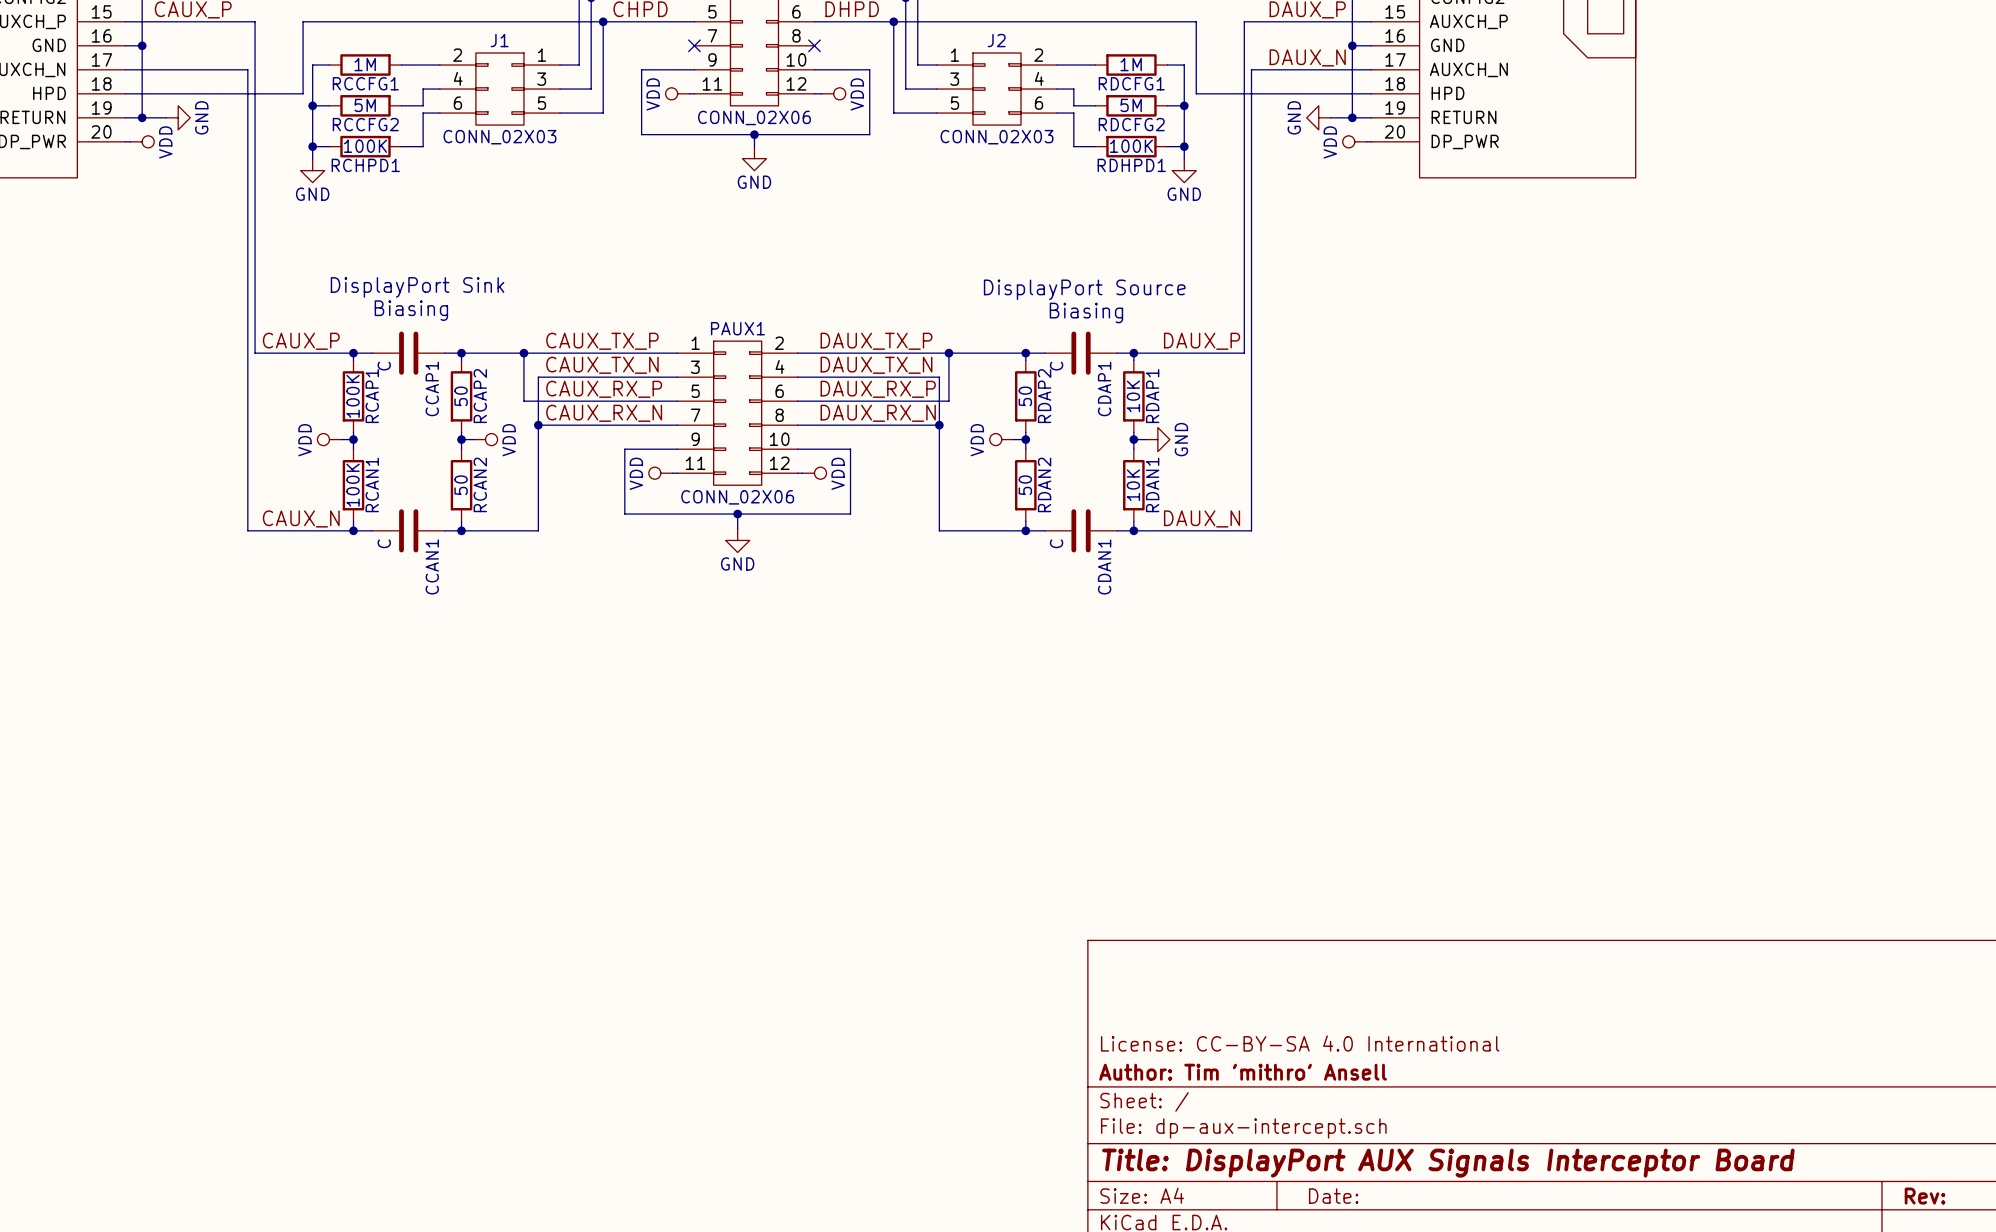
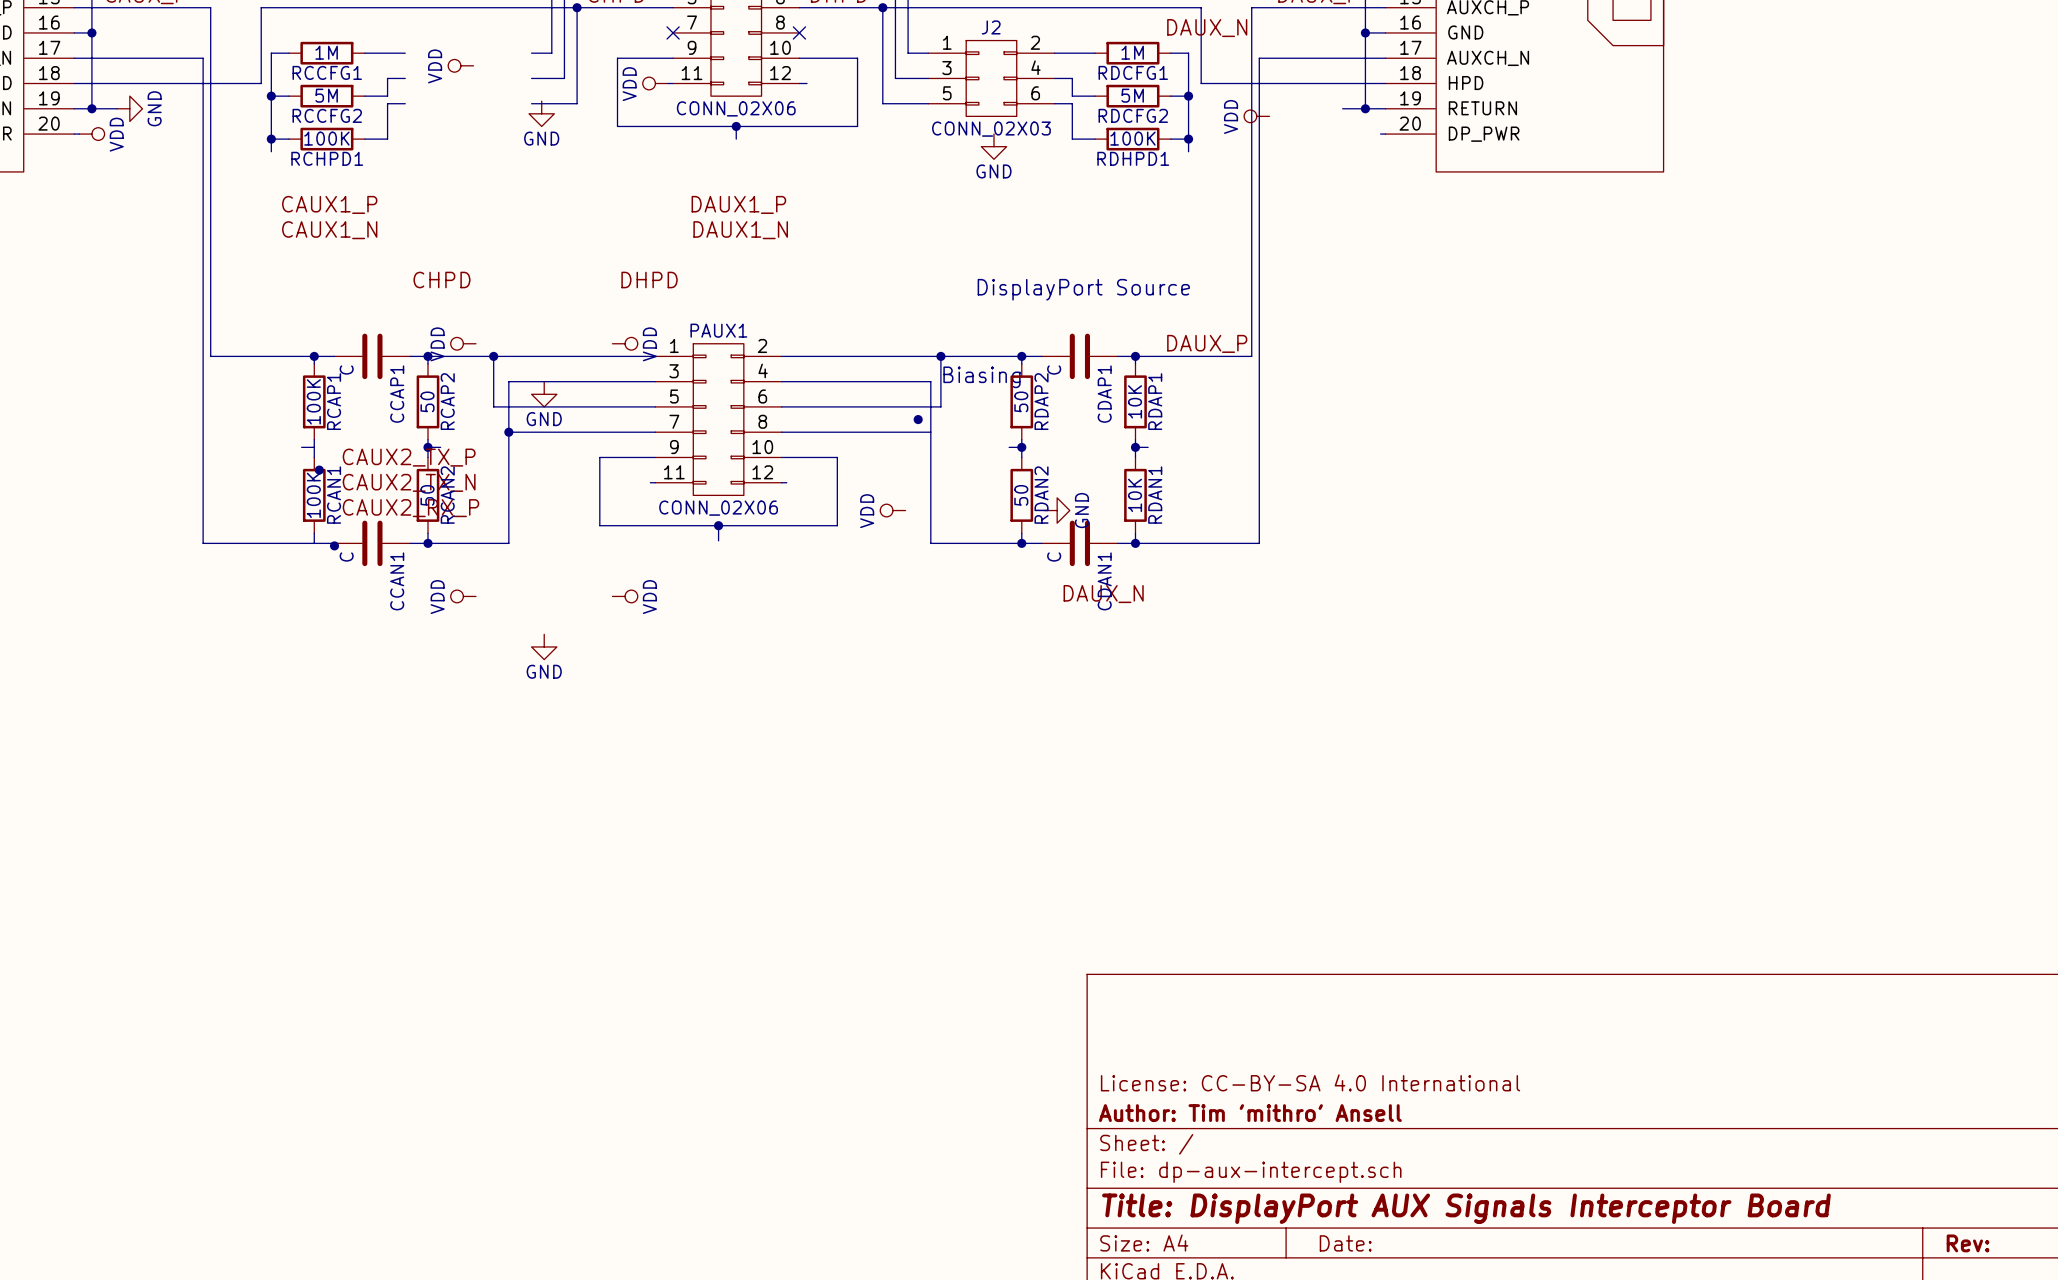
label position: DAUX_N (1307, 57) -> DAUX_N (1207, 28)
power symbol: none -> VDD (460, 65)
J1: CONN_02X03 (499, 89) -> none
power symbol: VDD (833, 93) -> none
power symbol: GND (1318, 117) -> none
power symbol: none -> GND (541, 113)
power symbol position: VDD (1354, 141) -> VDD (1256, 116)
power symbol: none -> GND (993, 146)
power symbol: GND (754, 158) -> none
power symbol: GND (312, 170) -> none
power symbol: GND (1184, 170) -> none
label: none -> CAUX1_P (329, 204)
label: none -> DAUX1_P (738, 204)
label: none -> CAUX1_N (329, 230)
label: none -> DAUX1_N (740, 230)
label: none -> CHPD (441, 280)
label: none -> DHPD (649, 280)
text: DisplayPort Sink (417, 287) -> none
text: Biasing (411, 310) -> none
text position: Biasing (1086, 313) -> Biasing (981, 377)
label: CAUX_P (301, 341) -> none
power symbol: none -> VDD (463, 343)
label: CAUX_TX_P (602, 341) -> none
power symbol: none -> VDD (625, 343)
label: DAUX_TX_P (876, 341) -> none
label: CAUX_TX_N (602, 365) -> none
label: DAUX_TX_N (876, 365) -> none
power symbol: none -> GND (544, 394)
label: CAUX_RX_P (604, 389) -> none
label: DAUX_RX_P (878, 389) -> none
label: CAUX_RX_N (604, 413) -> none
label: DAUX_RX_N (878, 413) -> none
junction position: (939, 425) -> (918, 419)
power symbol: VDD (329, 439) -> none
junction position: (353, 439) -> (319, 470)
power symbol: VDD (485, 439) -> none
power symbol: VDD (1001, 439) -> none
power symbol position: GND (1157, 439) -> GND (1057, 510)
label: none -> CAUX2_TX_P (409, 457)
label: none -> CAUX2_TX_N (409, 482)
power symbol: VDD (660, 473) -> none
power symbol: VDD (814, 473) -> none
label: none -> CAUX2_RX_P (410, 508)
power symbol: none -> VDD (892, 510)
label: CAUX_N (301, 518) -> none
label position: DAUX_N (1202, 518) -> DAUX_N (1103, 594)
junction position: (353, 530) -> (334, 545)
power symbol: GND (737, 540) -> none
power symbol: none -> VDD (463, 596)
power symbol: none -> VDD (625, 596)
power symbol: none -> GND (544, 646)

